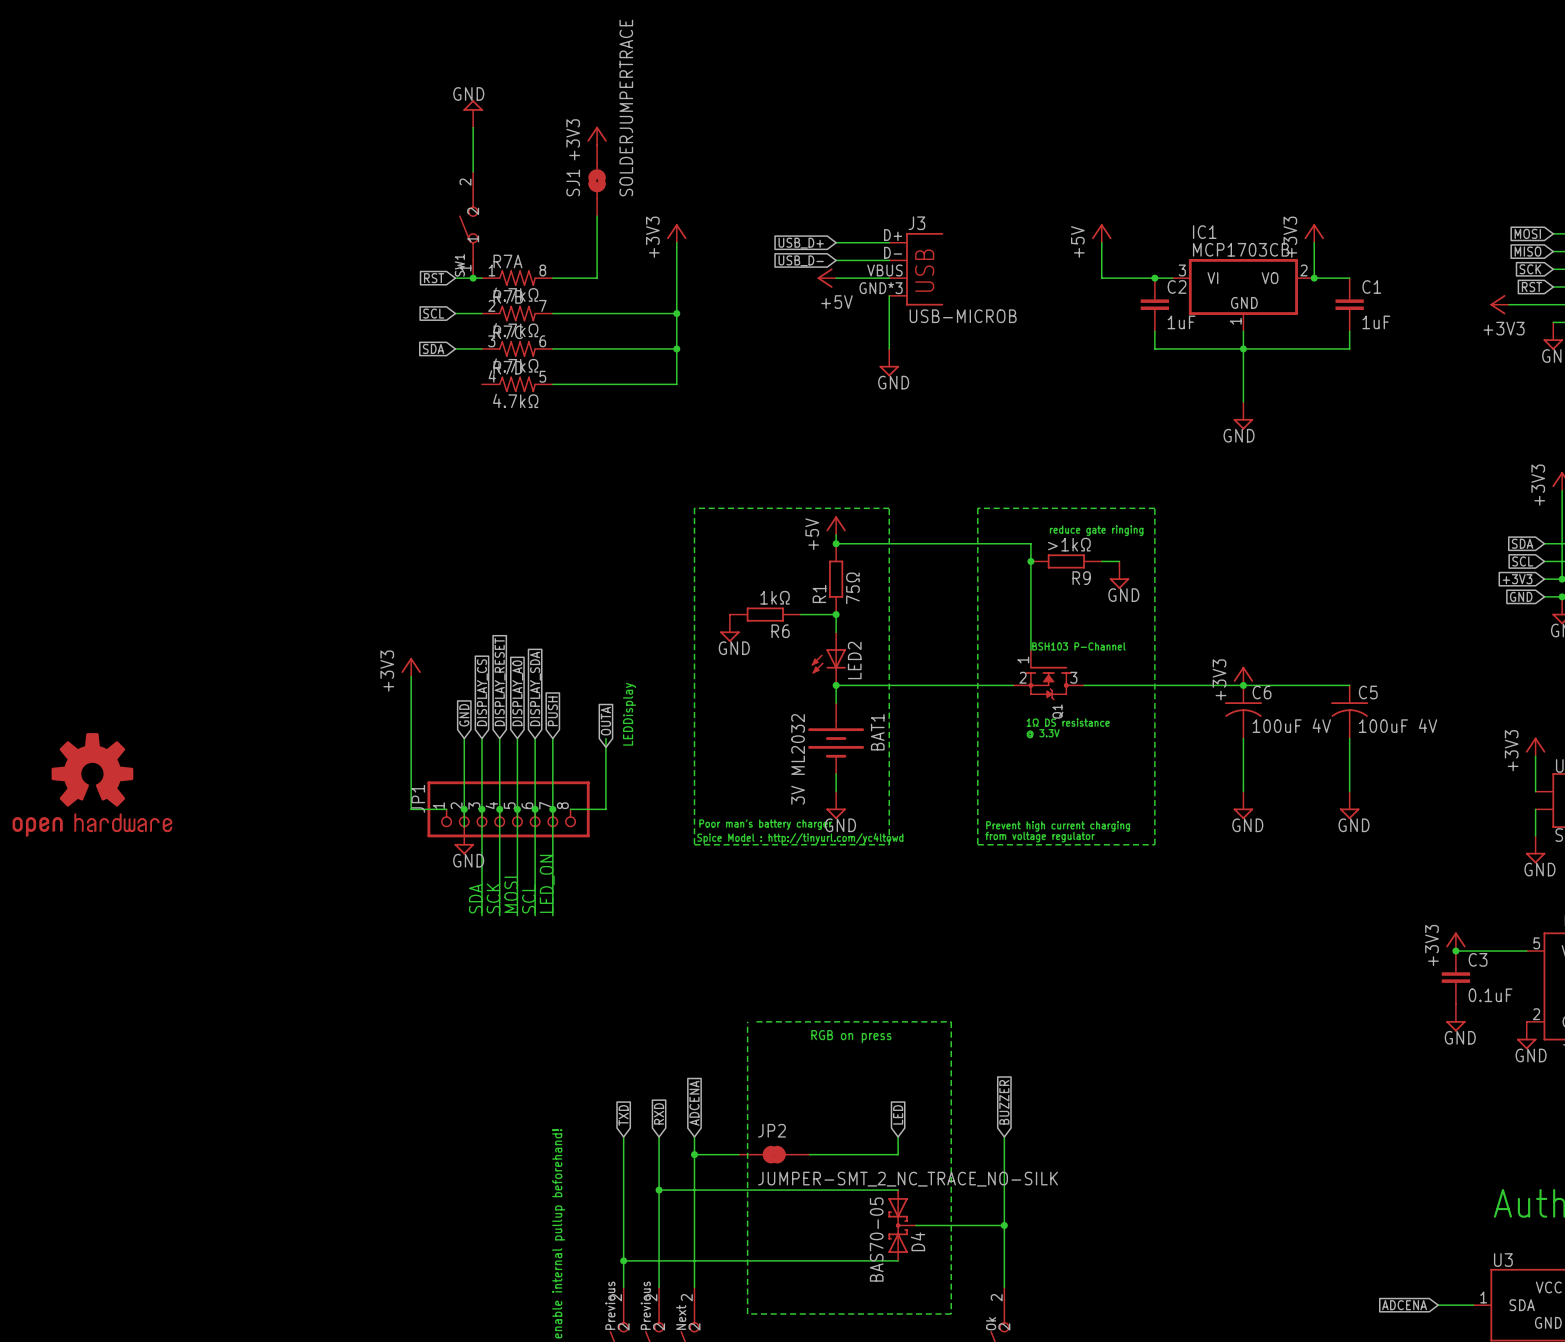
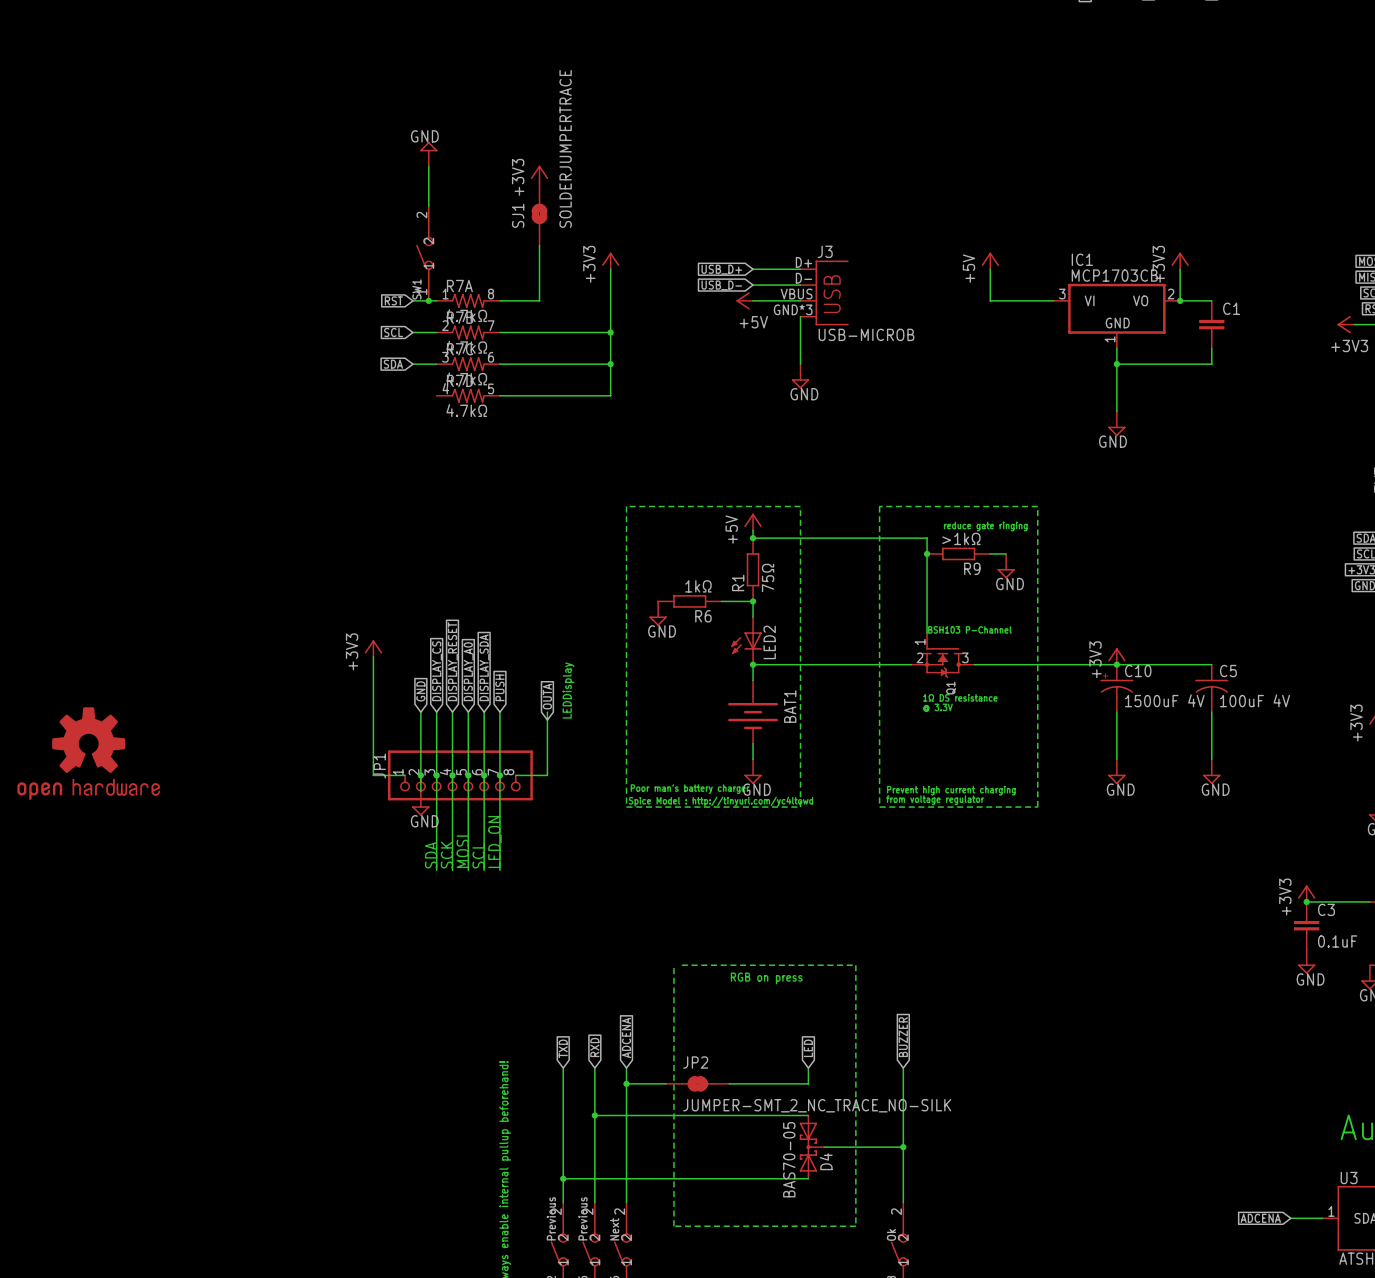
junction: (1154, 278) -> none
C2: 1uF (1154, 304) -> none
C1 value: 1uF (1376, 322) -> none
wire: (1154, 331) (1154, 348) (1243, 348) -> none
C6: 100uF 4V (1243, 711) -> none
C10: none -> 1500uF 4V (1116, 688)
BAT1 value: 3V ML2032 (798, 759) -> none

